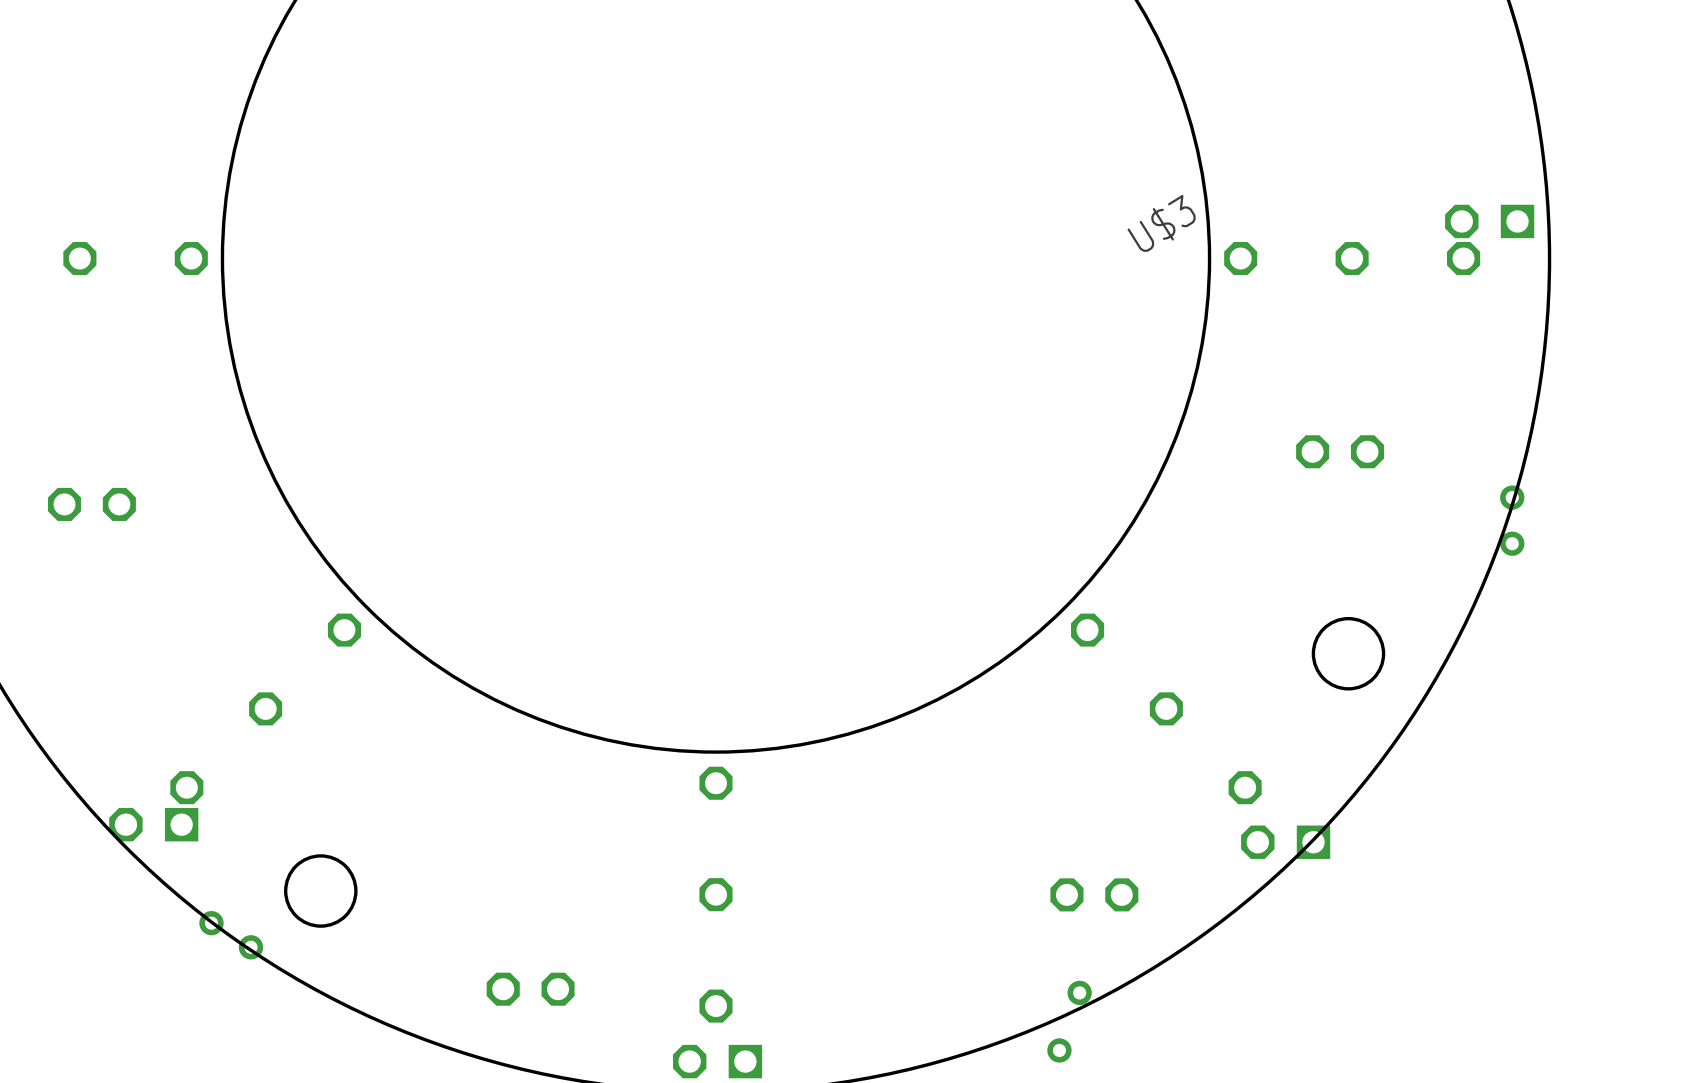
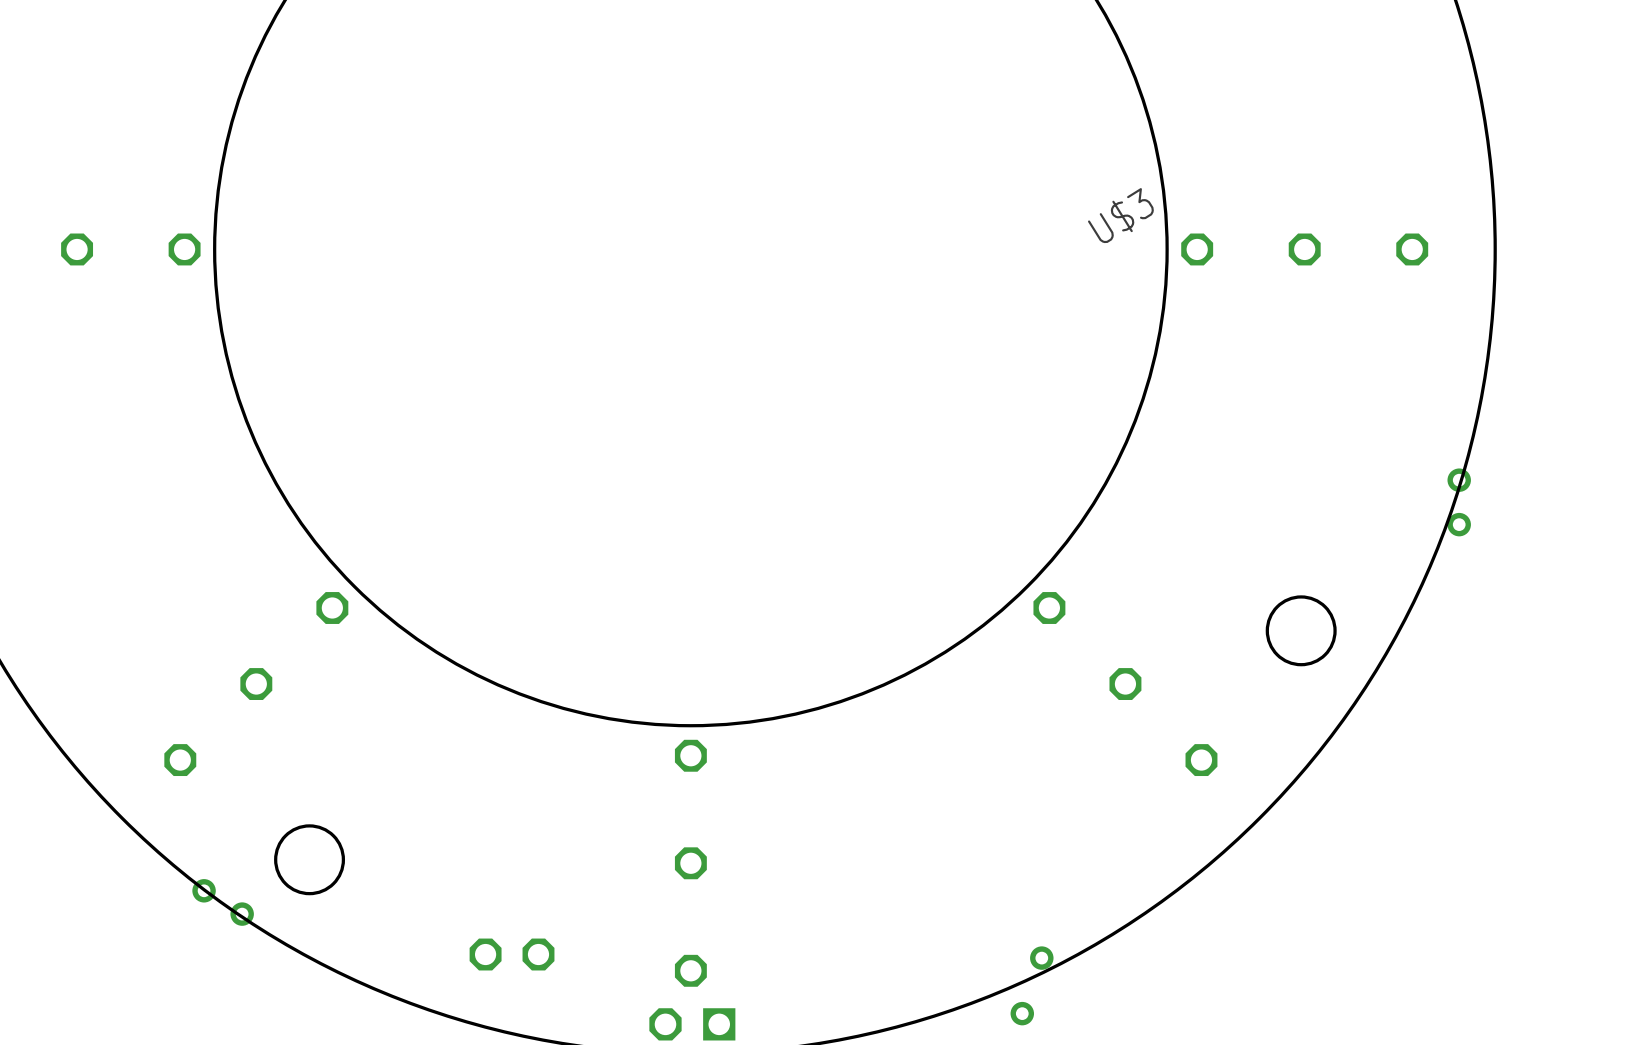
part: (1489, 221) -> none
part: (1340, 451) -> none
part: (91, 504) -> none
part: (153, 824) -> none
part: (1285, 842) -> none
part: (1094, 894) -> none

